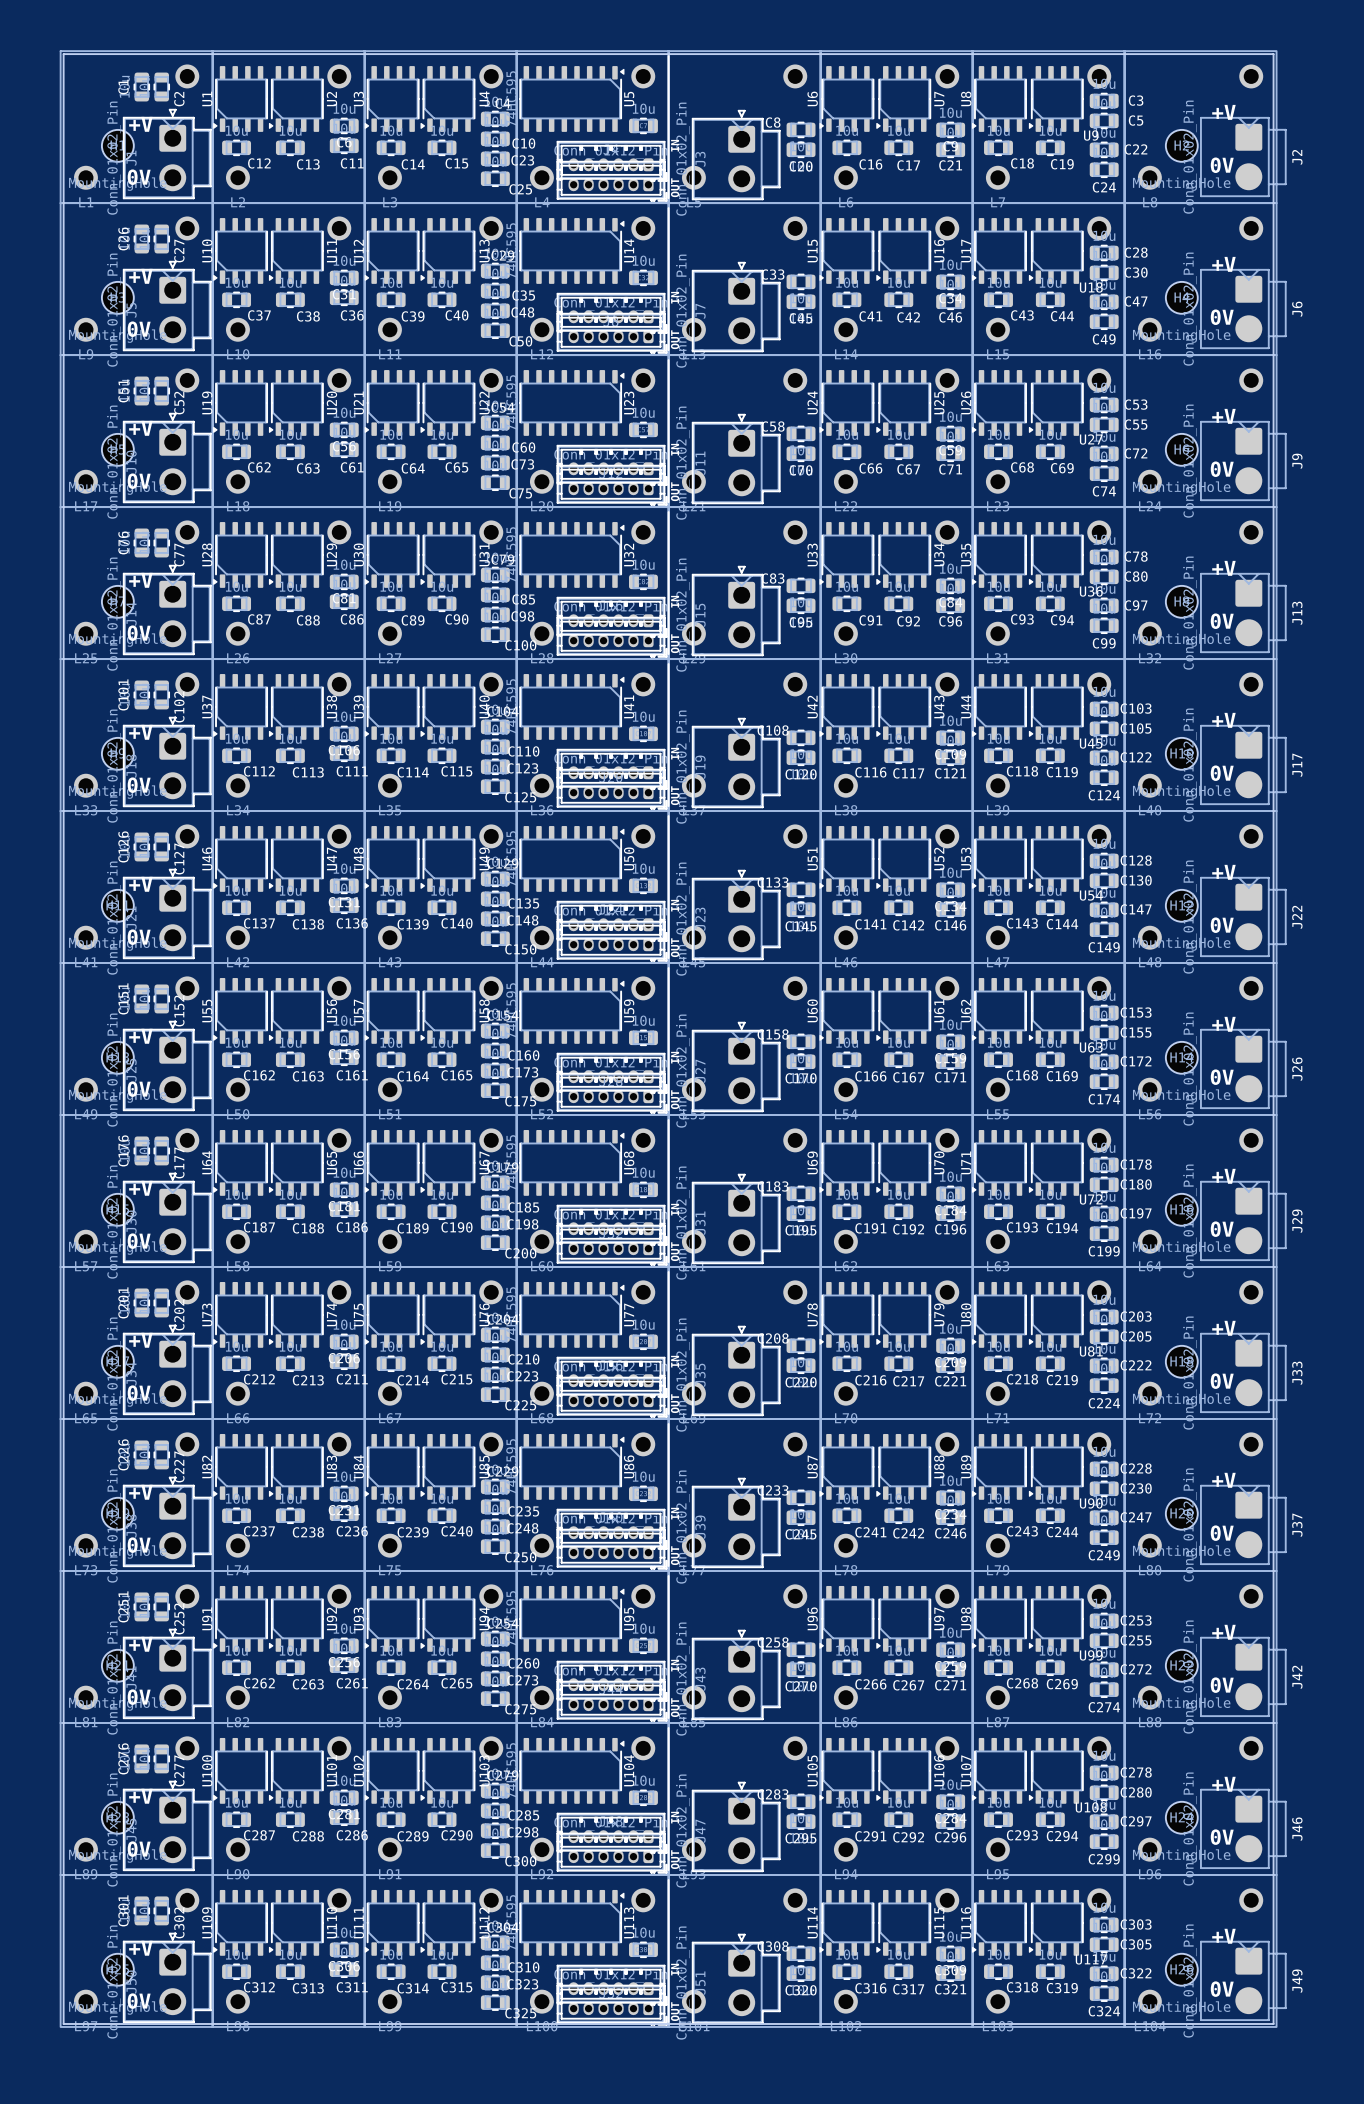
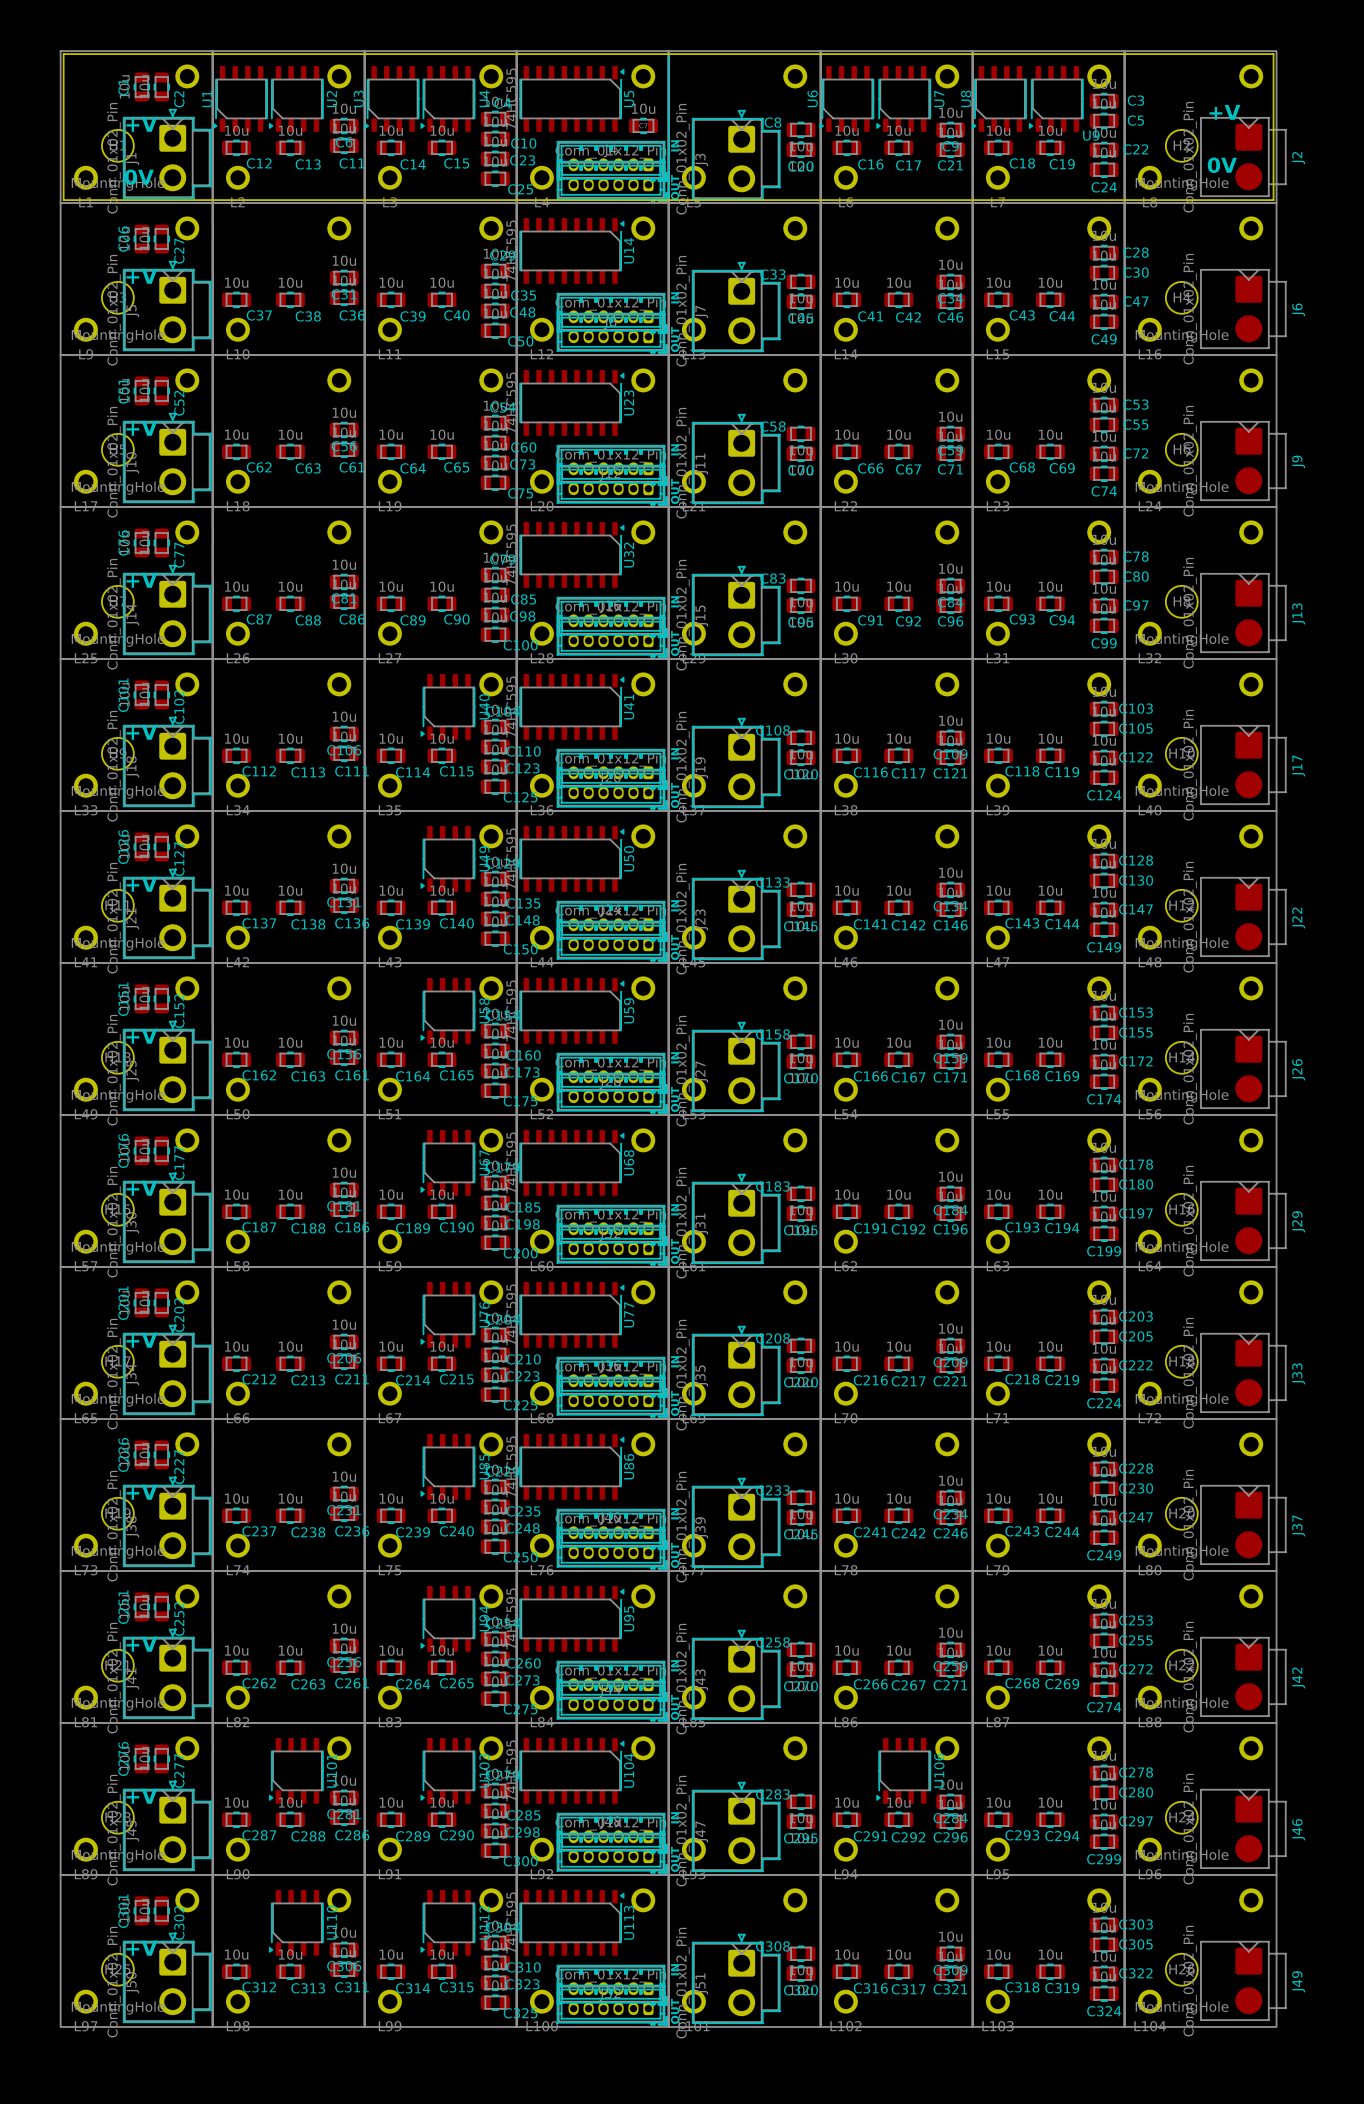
board edge: (63, 200) (63, 2023) (1273, 2023) (1273, 200) -> (63, 200) (1273, 200)
line: (668, 208) (668, 350) -> none
U10: (240, 250) -> none
U11: (296, 250) -> none
U12: (391, 250) -> none
U13: (447, 250) -> none
U15: (846, 250) -> none
U16: (903, 250) -> none
U17: (999, 250) -> none
U18: (1056, 250) -> none
text: +V (1223, 264) -> none
part: 10u (643, 277) -> none
text: 0V (1222, 317) -> none
text: 0V (139, 329) -> none
line: (668, 360) (668, 502) -> none
U19: (240, 402) -> none
U20: (296, 402) -> none
U21: (391, 402) -> none
U22: (447, 402) -> none
U24: (846, 402) -> none
U25: (903, 402) -> none
U26: (999, 402) -> none
U27: (1056, 402) -> none
text: +V (1223, 416) -> none
part: 10u (643, 429) -> none
text: 0V (1222, 469) -> none
text: 0V (139, 481) -> none
line: (668, 512) (668, 654) -> none
U28: (240, 554) -> none
U29: (296, 554) -> none
U30: (391, 554) -> none
U31: (447, 554) -> none
U33: (846, 554) -> none
U34: (903, 554) -> none
U35: (999, 554) -> none
U36: (1056, 554) -> none
text: +V (1223, 568) -> none
part: 10u (643, 581) -> none
text: 0V (1222, 621) -> none
text: 0V (139, 633) -> none
line: (668, 664) (668, 806) -> none
U37: (240, 706) -> none
U38: (296, 706) -> none
U39: (391, 706) -> none
U42: (846, 706) -> none
U43: (903, 706) -> none
U44: (999, 706) -> none
U45: (1056, 706) -> none
text: +V (1223, 720) -> none
part: 10u (643, 733) -> none
text: 0V (1222, 773) -> none
text: 0V (139, 785) -> none
line: (668, 816) (668, 958) -> none
U46: (240, 858) -> none
U47: (296, 858) -> none
U48: (391, 858) -> none
U51: (846, 858) -> none
U52: (903, 858) -> none
U53: (999, 858) -> none
U54: (1056, 858) -> none
text: +V (1223, 872) -> none
part: 10u (643, 885) -> none
text: 0V (1222, 925) -> none
text: 0V (139, 937) -> none
line: (668, 968) (668, 1110) -> none
U55: (240, 1010) -> none
U56: (296, 1010) -> none
U57: (391, 1010) -> none
U60: (846, 1010) -> none
U61: (903, 1010) -> none
U62: (999, 1010) -> none
U63: (1056, 1010) -> none
text: +V (1223, 1024) -> none
part: 10u (643, 1037) -> none
text: 0V (1222, 1077) -> none
text: 0V (139, 1089) -> none
line: (668, 1120) (668, 1262) -> none
U64: (240, 1162) -> none
U65: (296, 1162) -> none
U66: (391, 1162) -> none
U69: (846, 1162) -> none
U70: (903, 1162) -> none
U71: (999, 1162) -> none
U72: (1056, 1162) -> none
text: +V (1223, 1176) -> none
part: 10u (643, 1189) -> none
text: 0V (1222, 1229) -> none
text: 0V (139, 1241) -> none
line: (668, 1272) (668, 1414) -> none
U73: (240, 1314) -> none
U74: (296, 1314) -> none
U75: (391, 1314) -> none
U78: (846, 1314) -> none
U79: (903, 1314) -> none
U80: (999, 1314) -> none
U81: (1056, 1314) -> none
text: +V (1223, 1328) -> none
part: 10u (643, 1341) -> none
text: 0V (1222, 1381) -> none
text: 0V (139, 1393) -> none
line: (668, 1424) (668, 1566) -> none
U82: (240, 1466) -> none
U83: (296, 1466) -> none
U84: (391, 1466) -> none
U87: (846, 1466) -> none
U88: (903, 1466) -> none
U89: (999, 1466) -> none
U90: (1056, 1466) -> none
text: +V (1223, 1480) -> none
part: 10u (643, 1493) -> none
text: 0V (1222, 1533) -> none
text: 0V (139, 1545) -> none
line: (668, 1576) (668, 1718) -> none
U91: (240, 1618) -> none
U92: (296, 1618) -> none
U93: (391, 1618) -> none
U96: (846, 1618) -> none
U97: (903, 1618) -> none
U98: (999, 1618) -> none
U99: (1056, 1618) -> none
text: +V (1223, 1632) -> none
part: 10u (643, 1645) -> none
text: 0V (1222, 1685) -> none
text: 0V (139, 1697) -> none
line: (668, 1727) (668, 1870) -> none
U100: (240, 1770) -> none
U102: (391, 1770) -> none
U105: (846, 1770) -> none
U107: (999, 1770) -> none
U108: (1056, 1770) -> none
text: +V (1223, 1784) -> none
part: 10u (643, 1797) -> none
text: 0V (1222, 1837) -> none
text: 0V (139, 1849) -> none
line: (668, 1879) (668, 2022) -> none
U109: (240, 1922) -> none
U111: (391, 1922) -> none
U114: (846, 1922) -> none
U115: (903, 1922) -> none
U116: (999, 1922) -> none
U117: (1056, 1922) -> none
text: +V (1223, 1936) -> none
part: 10u (643, 1949) -> none
text: 0V (1222, 1989) -> none
text: 0V (139, 2001) -> none

